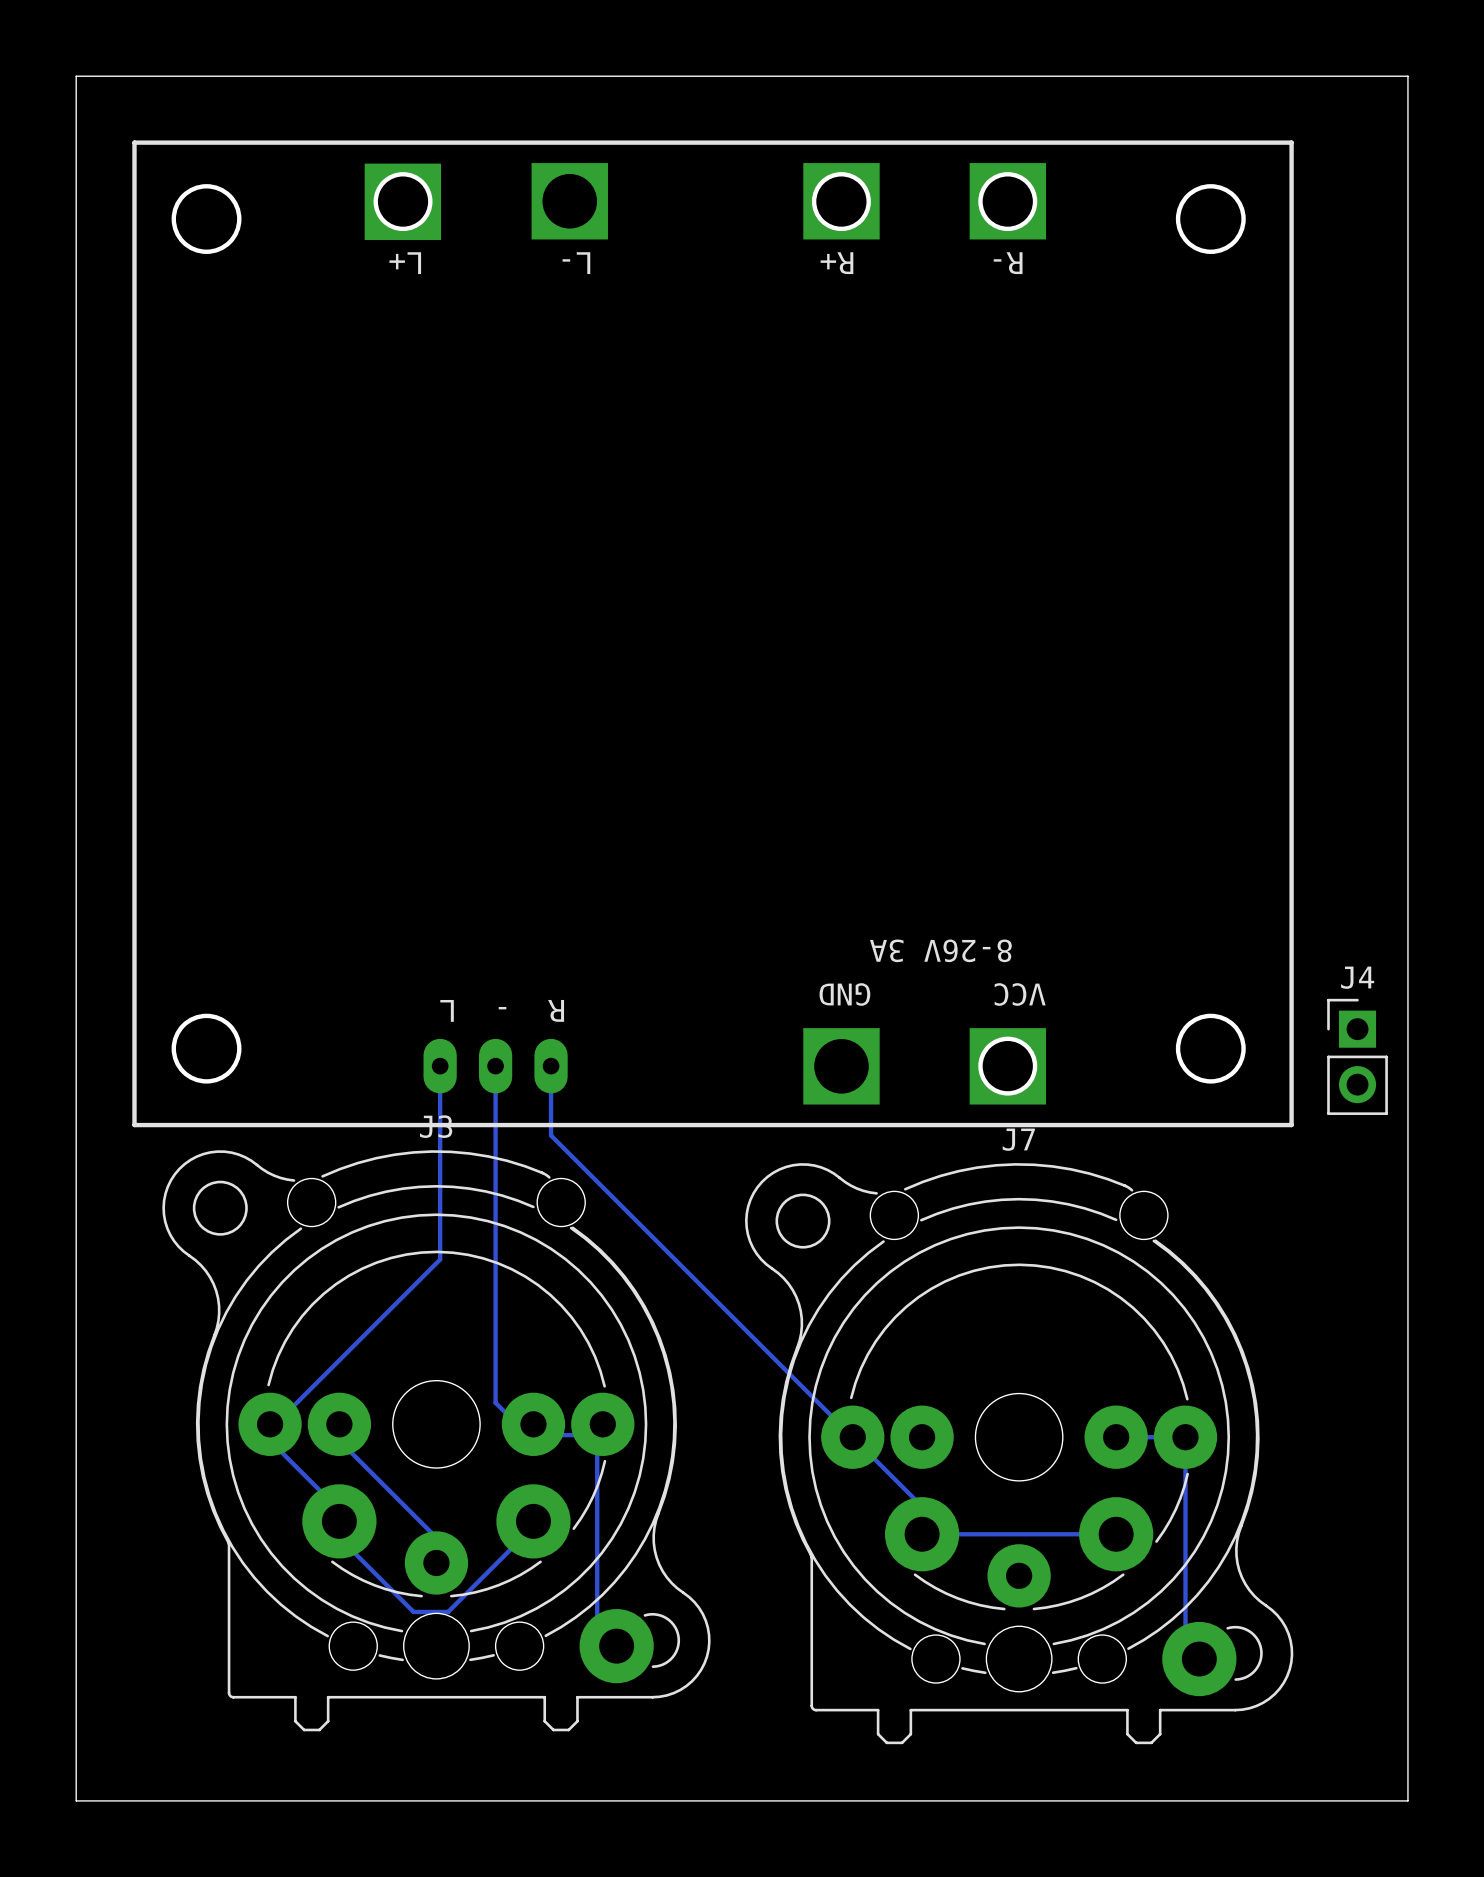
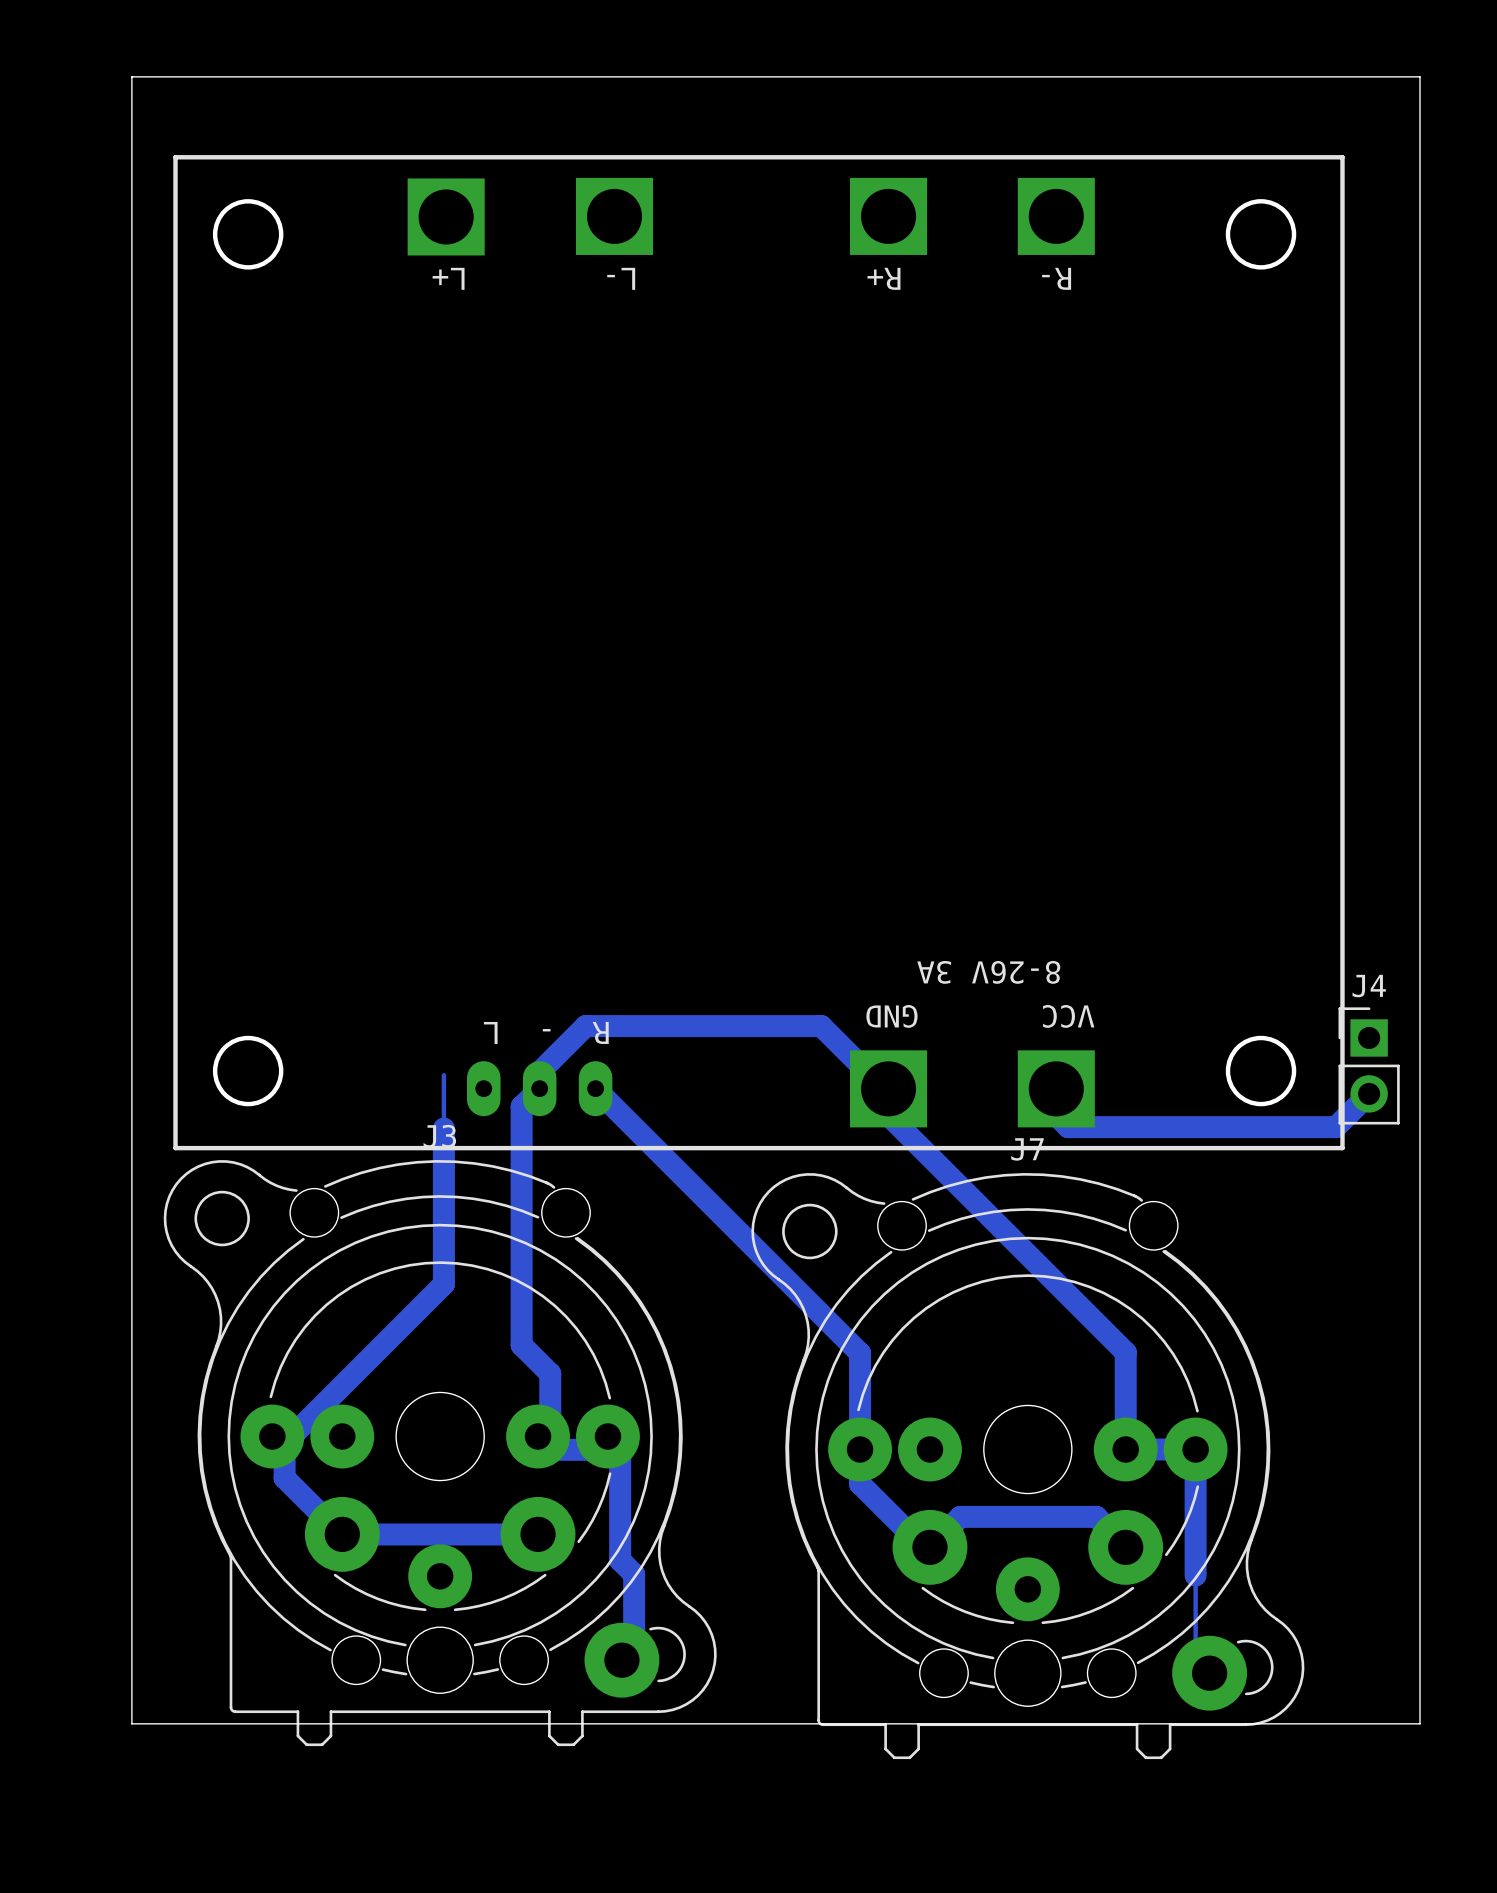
board edge: (130, 76) (76, 76) (76, 1800) (1407, 1800) (1407, 1709) -> (131, 76) (131, 1723) (1419, 1723)
part: (713, 633) -> none
part: none -> (758, 652)
bottom track: (495, 1066) (495, 1402) (527, 1435) (597, 1435) (597, 1643) (611, 1656) -> none
bottom track: (551, 1066) (551, 1135) (922, 1506) (922, 1534) (1116, 1534) -> (929, 1547) (960, 1516) (1096, 1516) (1125, 1547)
bottom track: none -> (595, 1088) (860, 1353) (860, 1483) (923, 1547)
bottom track: none -> (1056, 1088) (1056, 1115) (1068, 1127) (1335, 1127) (1369, 1093)
bottom track width: thin (440, 1118) (440, 1259) -> thick (443, 1128) (443, 1270)
bottom track: (440, 1259) (264, 1435) (333, 1504) (333, 1532) (413, 1611) (448, 1611) (527, 1532) -> (443, 1270) (443, 1284) (284, 1443) (284, 1478) (354, 1547)
bottom track: (333, 1435) (430, 1532) (430, 1573) -> none
bottom track: none -> (1125, 1449) (1125, 1352) (888, 1115) (888, 1088) (884, 1088) (821, 1026) (585, 1026) (539, 1072) (539, 1088) (521, 1106) (521, 1345) (550, 1373) (550, 1449) (620, 1449) (620, 1560) (634, 1574) (634, 1673)
bottom track width: thin (1116, 1437) (1185, 1437) (1185, 1562) -> thick (1125, 1449) (1195, 1449) (1195, 1575)
bottom track: none -> (354, 1547) (367, 1534) (537, 1534) (550, 1547)

